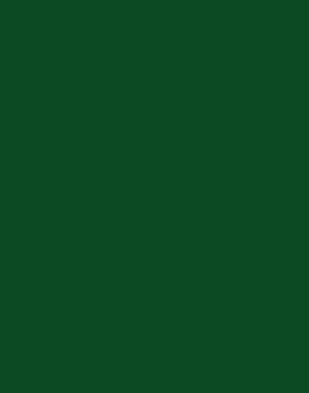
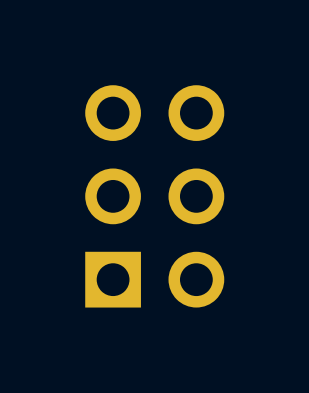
part: none -> (154, 196)

